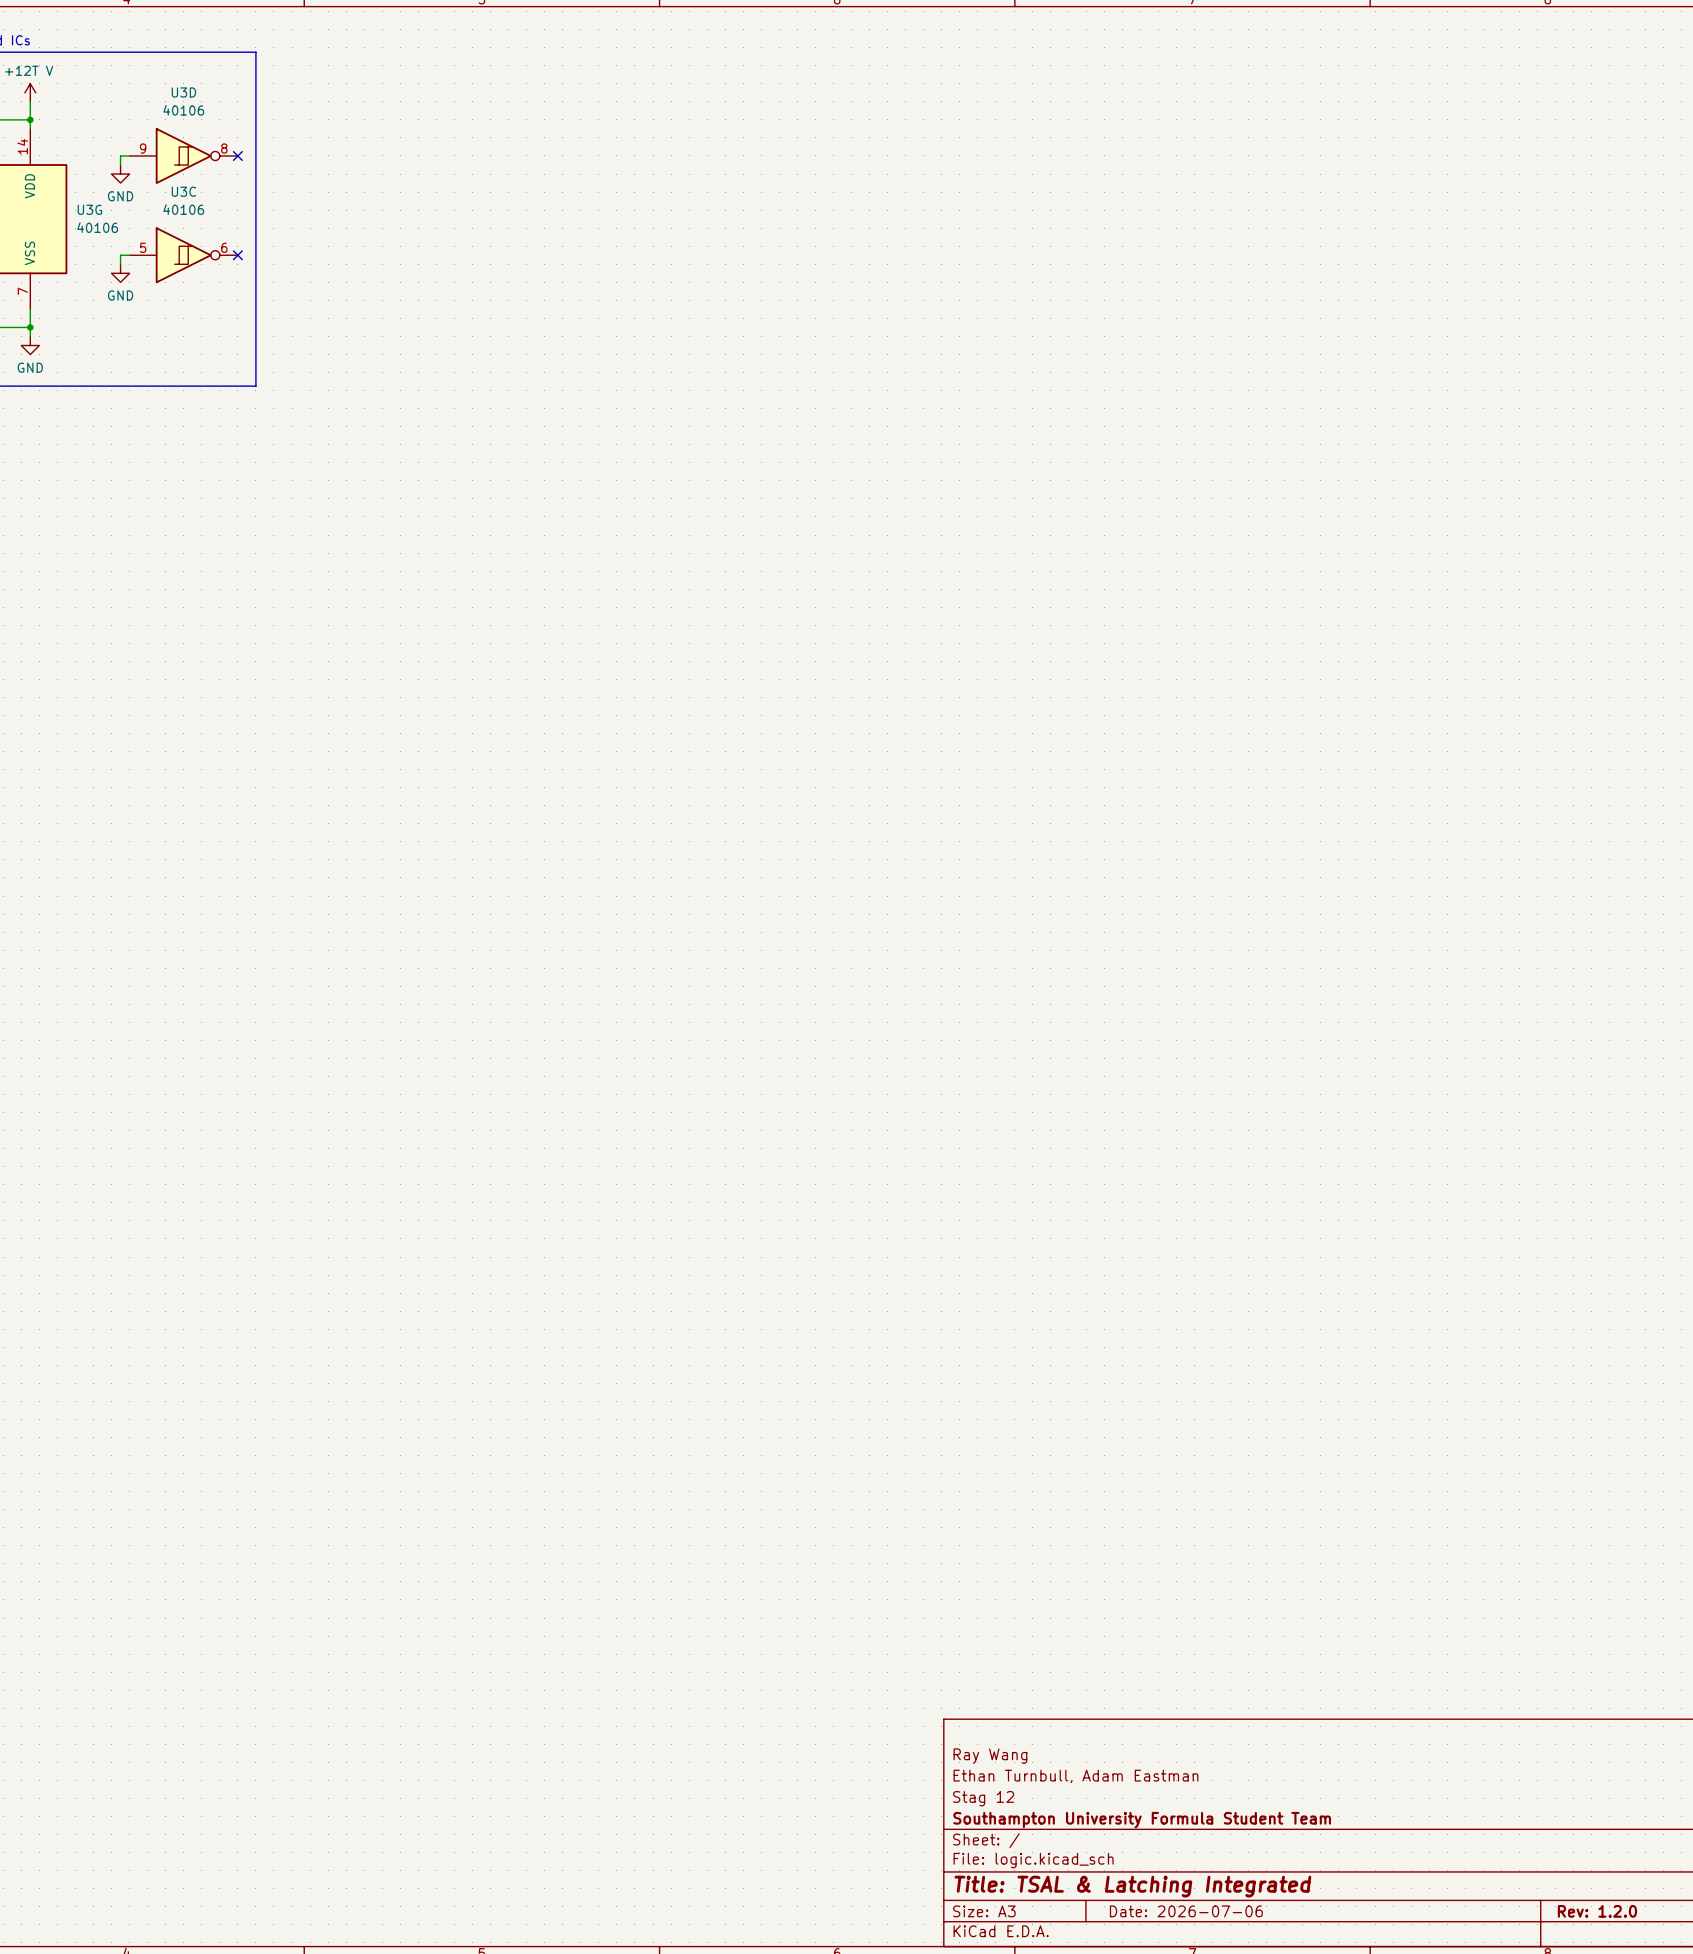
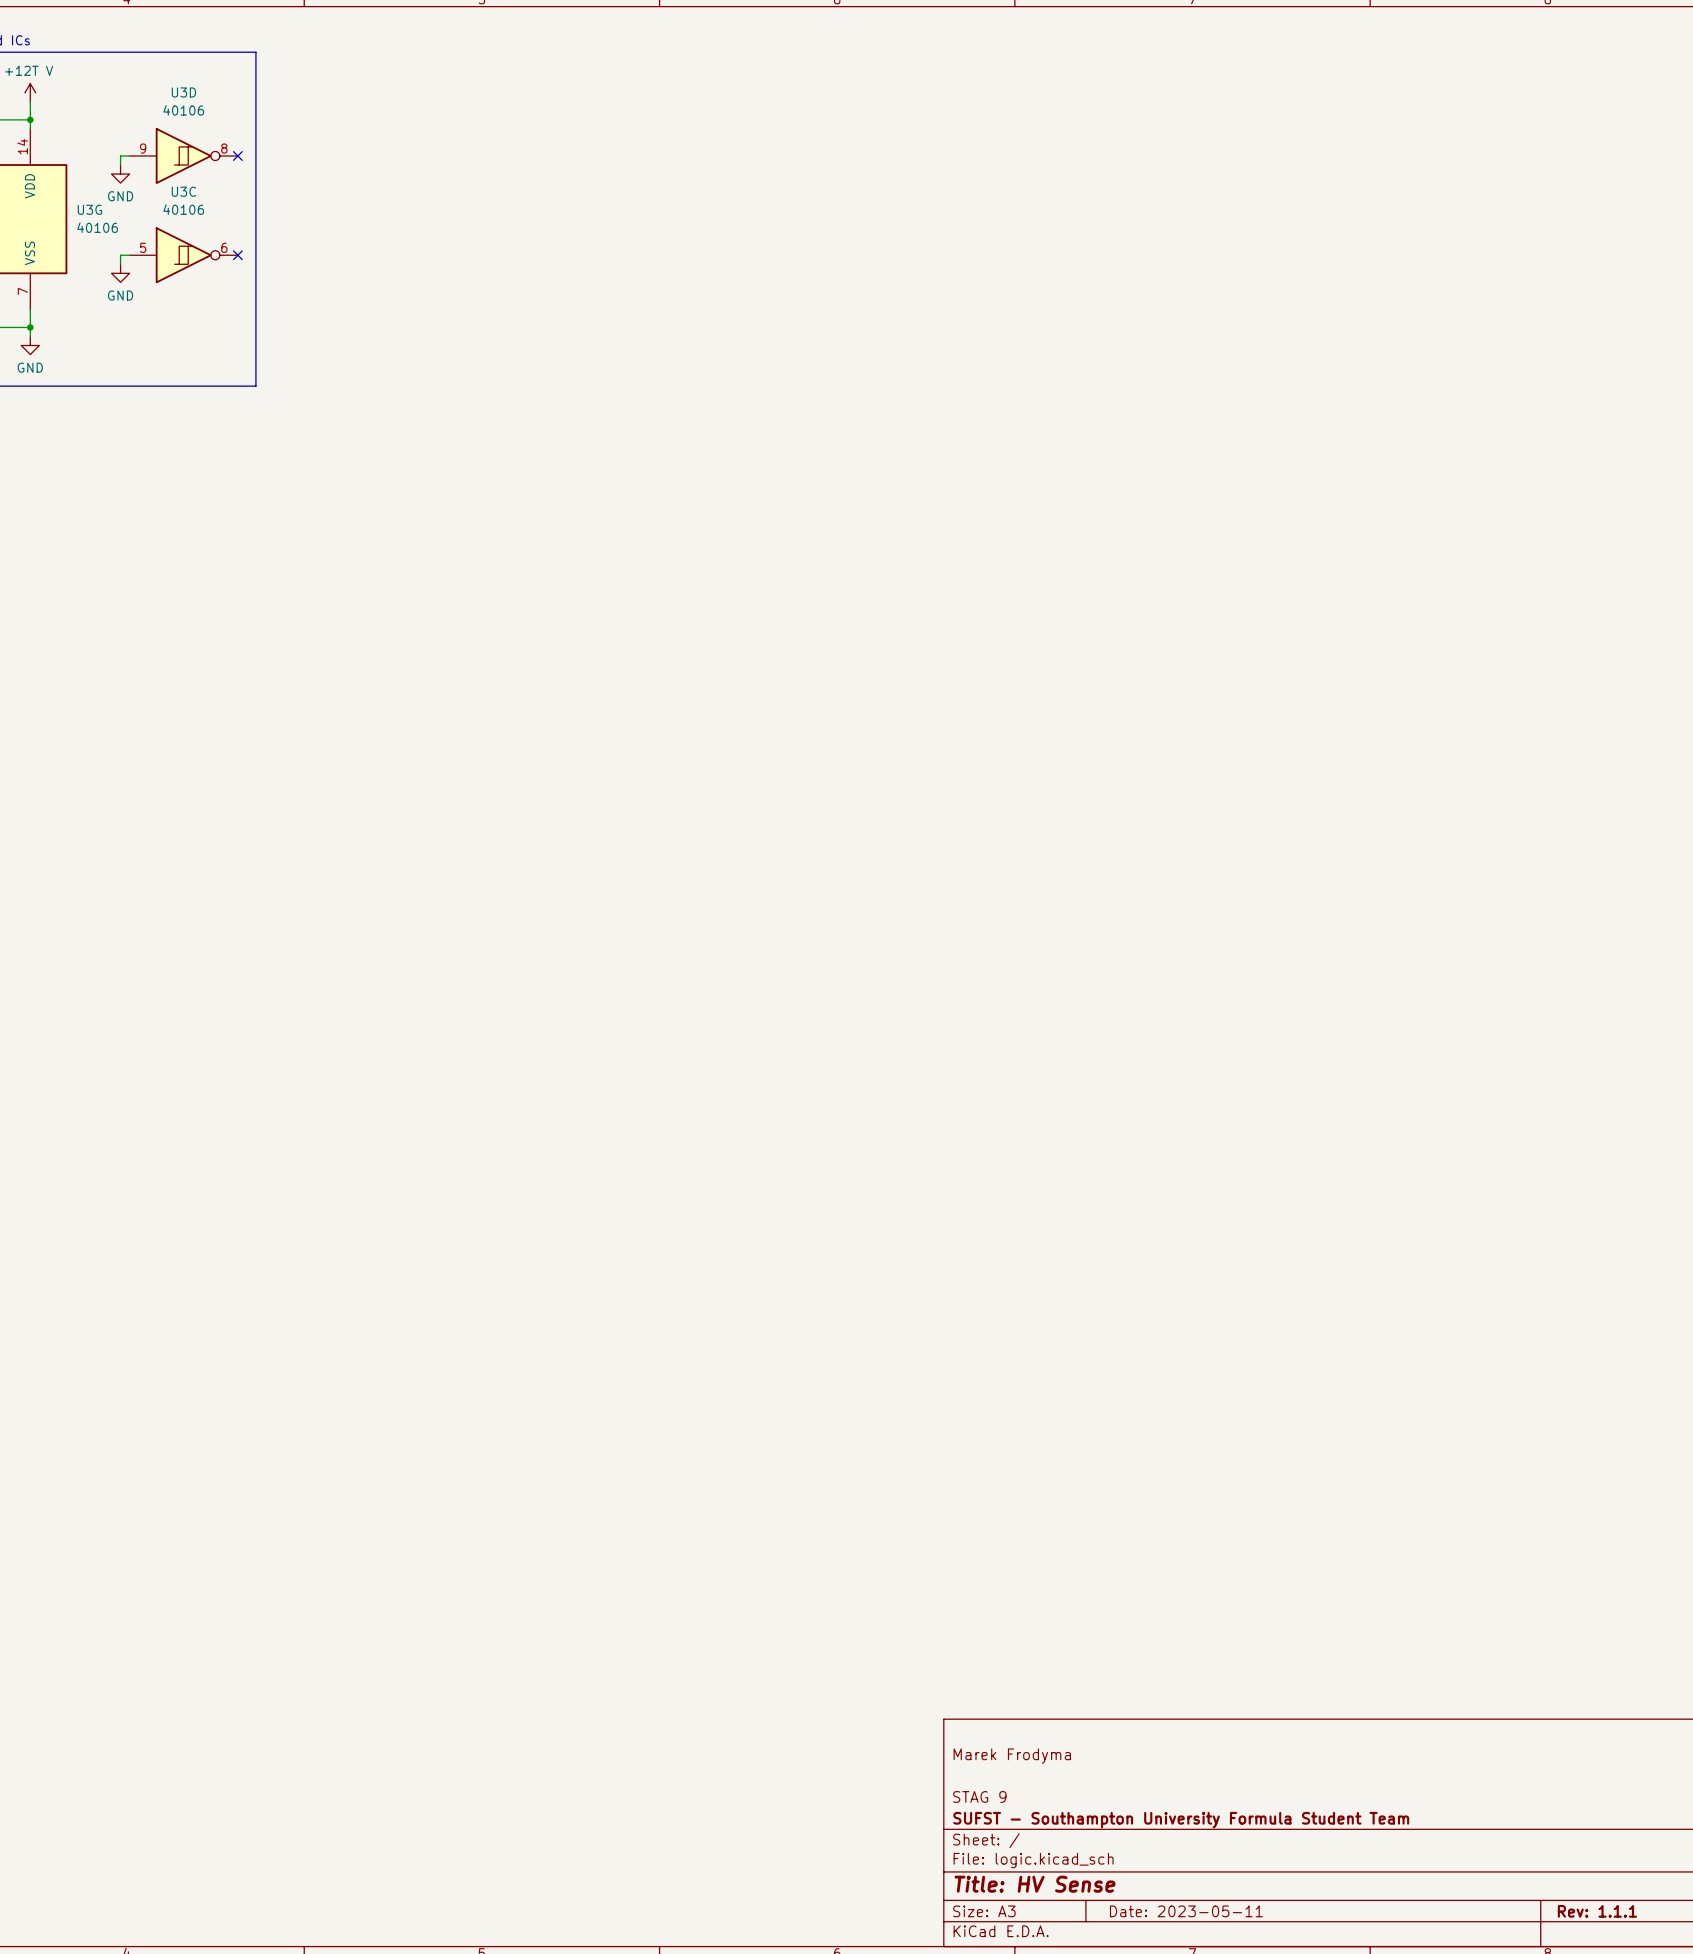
title block: Ray Wang (990, 1756) -> Marek Frodyma (1012, 1756)
title block: Ethan Turnbull, Adam Eastman (1075, 1776) -> none
title block: Stag 12 (983, 1798) -> STAG 9 (979, 1796)
title block: Southampton University Formula Student Team (1142, 1820) -> SUFST - Southampton University Formula Student Team (1181, 1820)
title block: Title: TSAL & Latching Integrated (1132, 1886) -> Title: HV Sense (1035, 1884)
title block: Date: 2026-07-06 (1186, 1911) -> Date: 2023-05-11 (1186, 1911)
title block: Rev: 1.2.0 (1597, 1911) -> Rev: 1.1.1 (1597, 1911)

